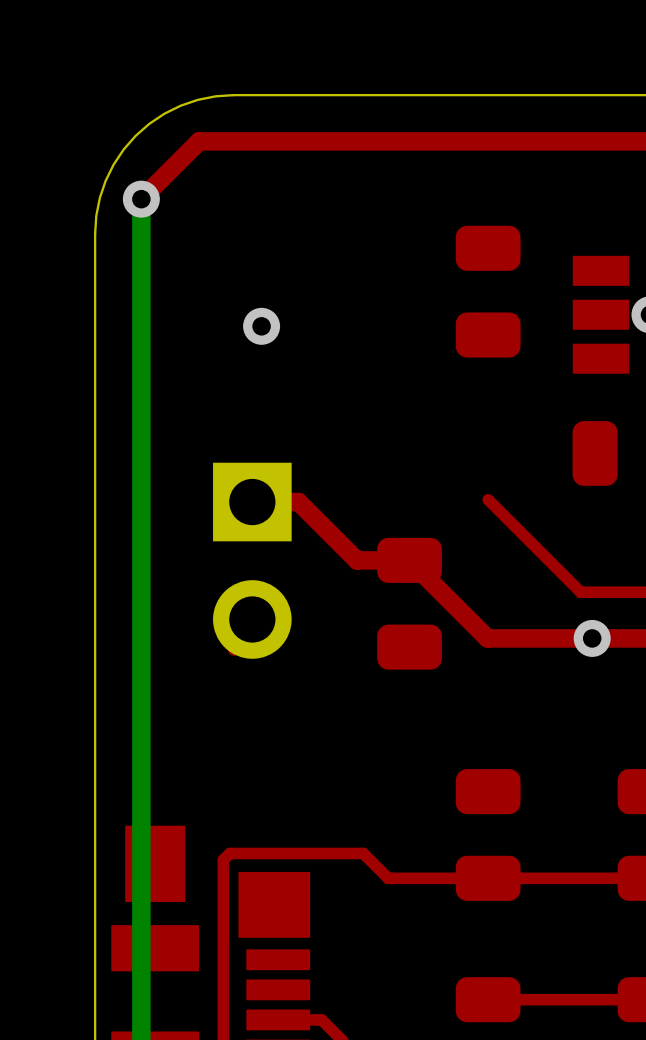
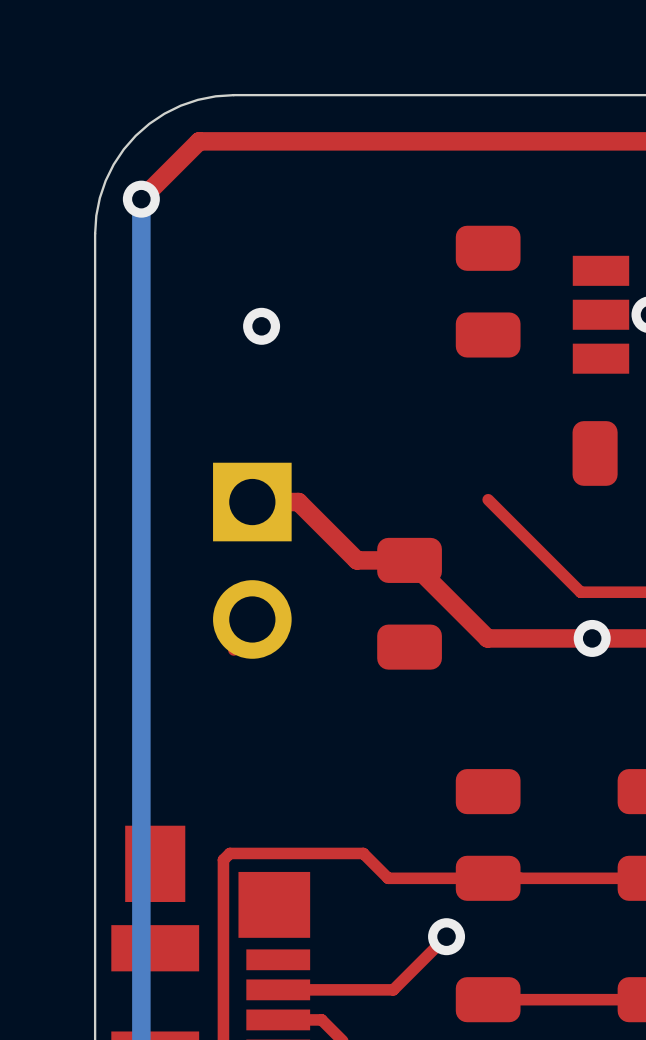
top track: none -> (446, 936) (393, 989) (278, 989)
via: none -> (446, 936)

